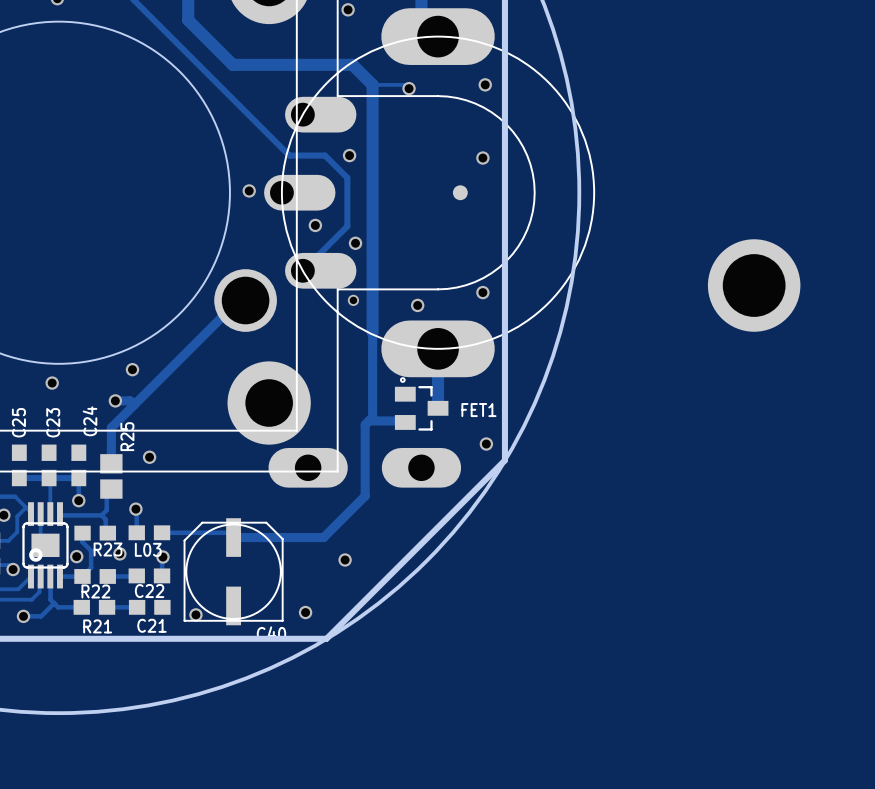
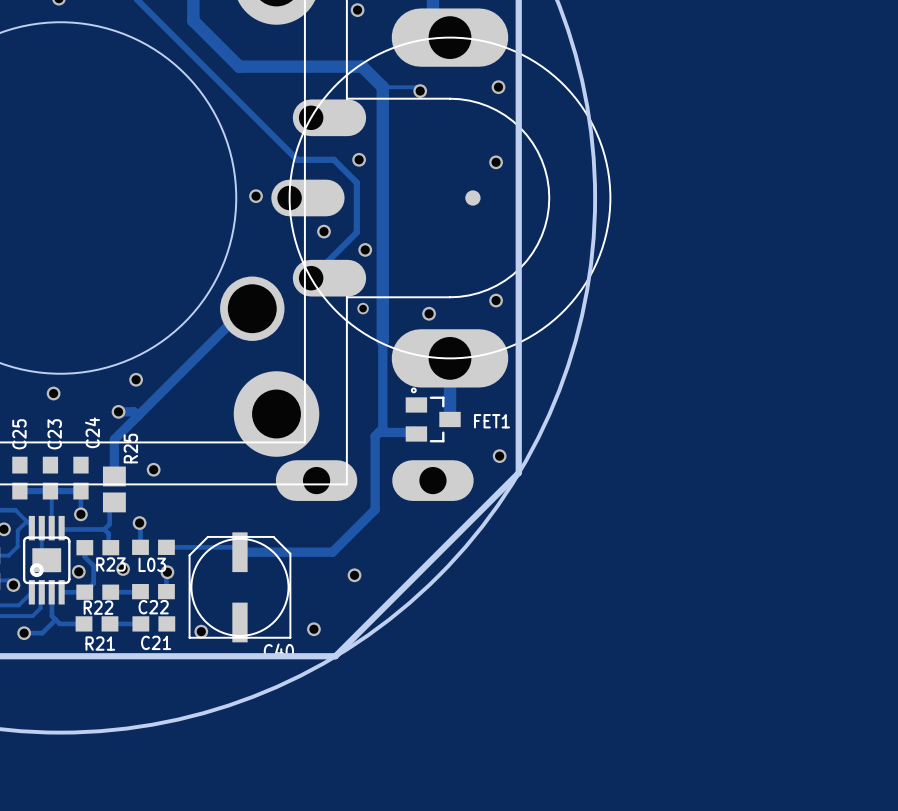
part: (754, 285) -> none

